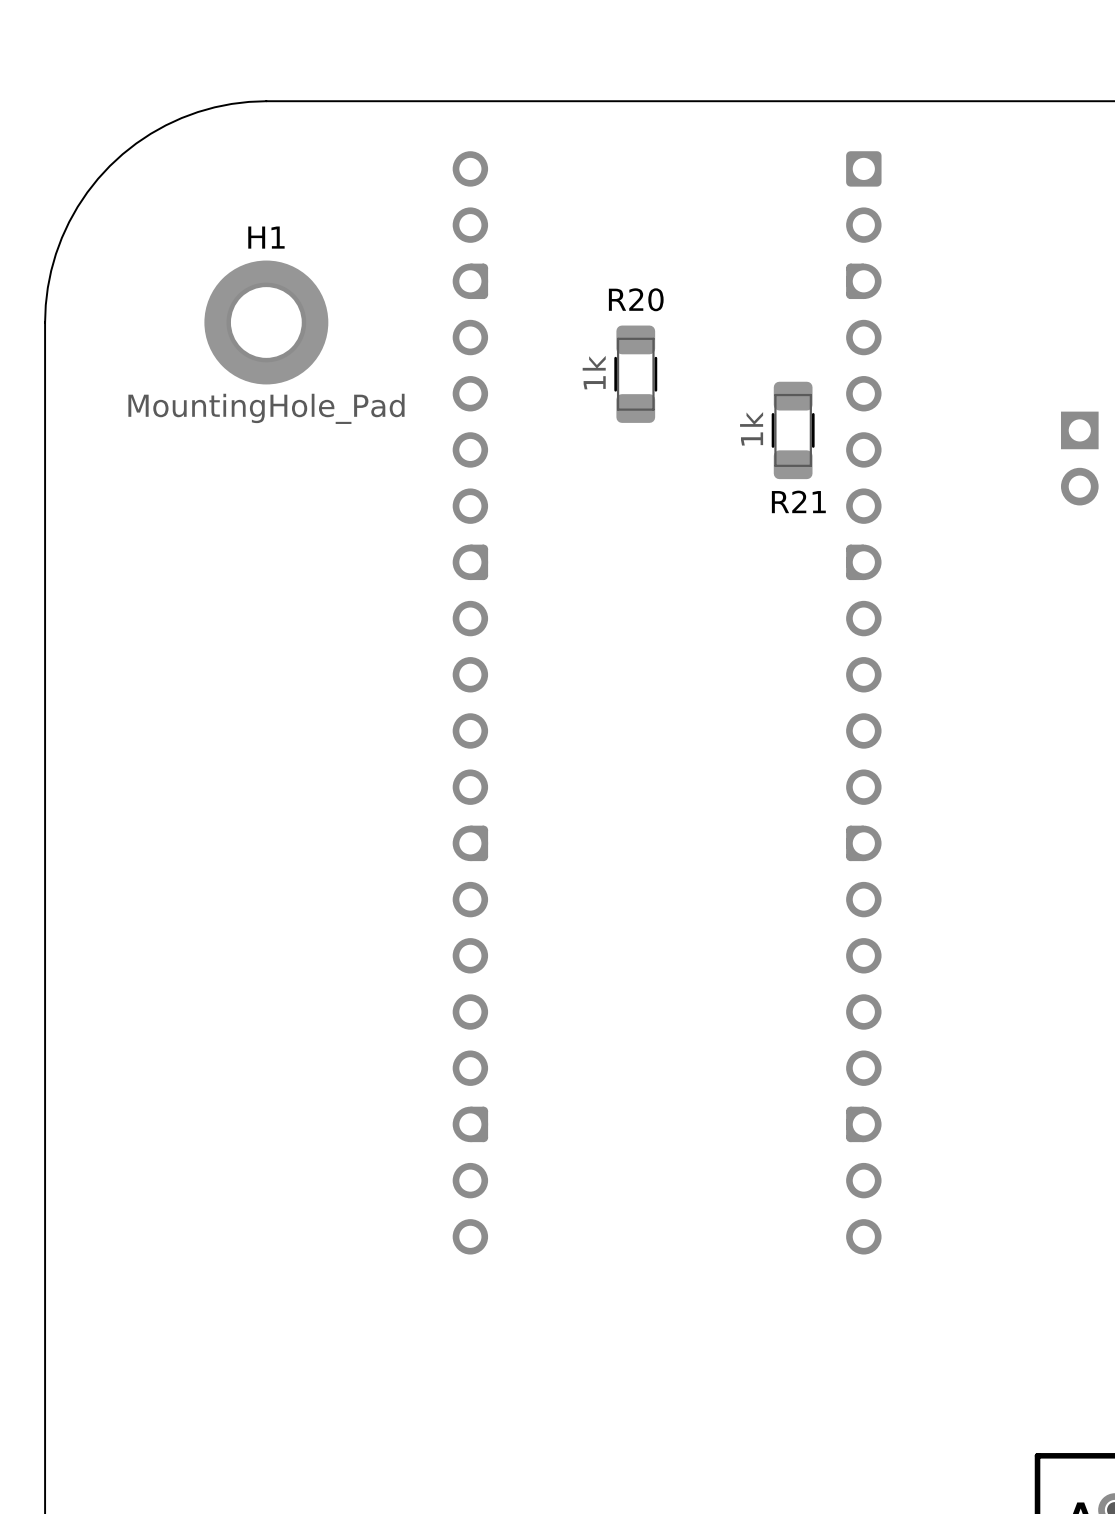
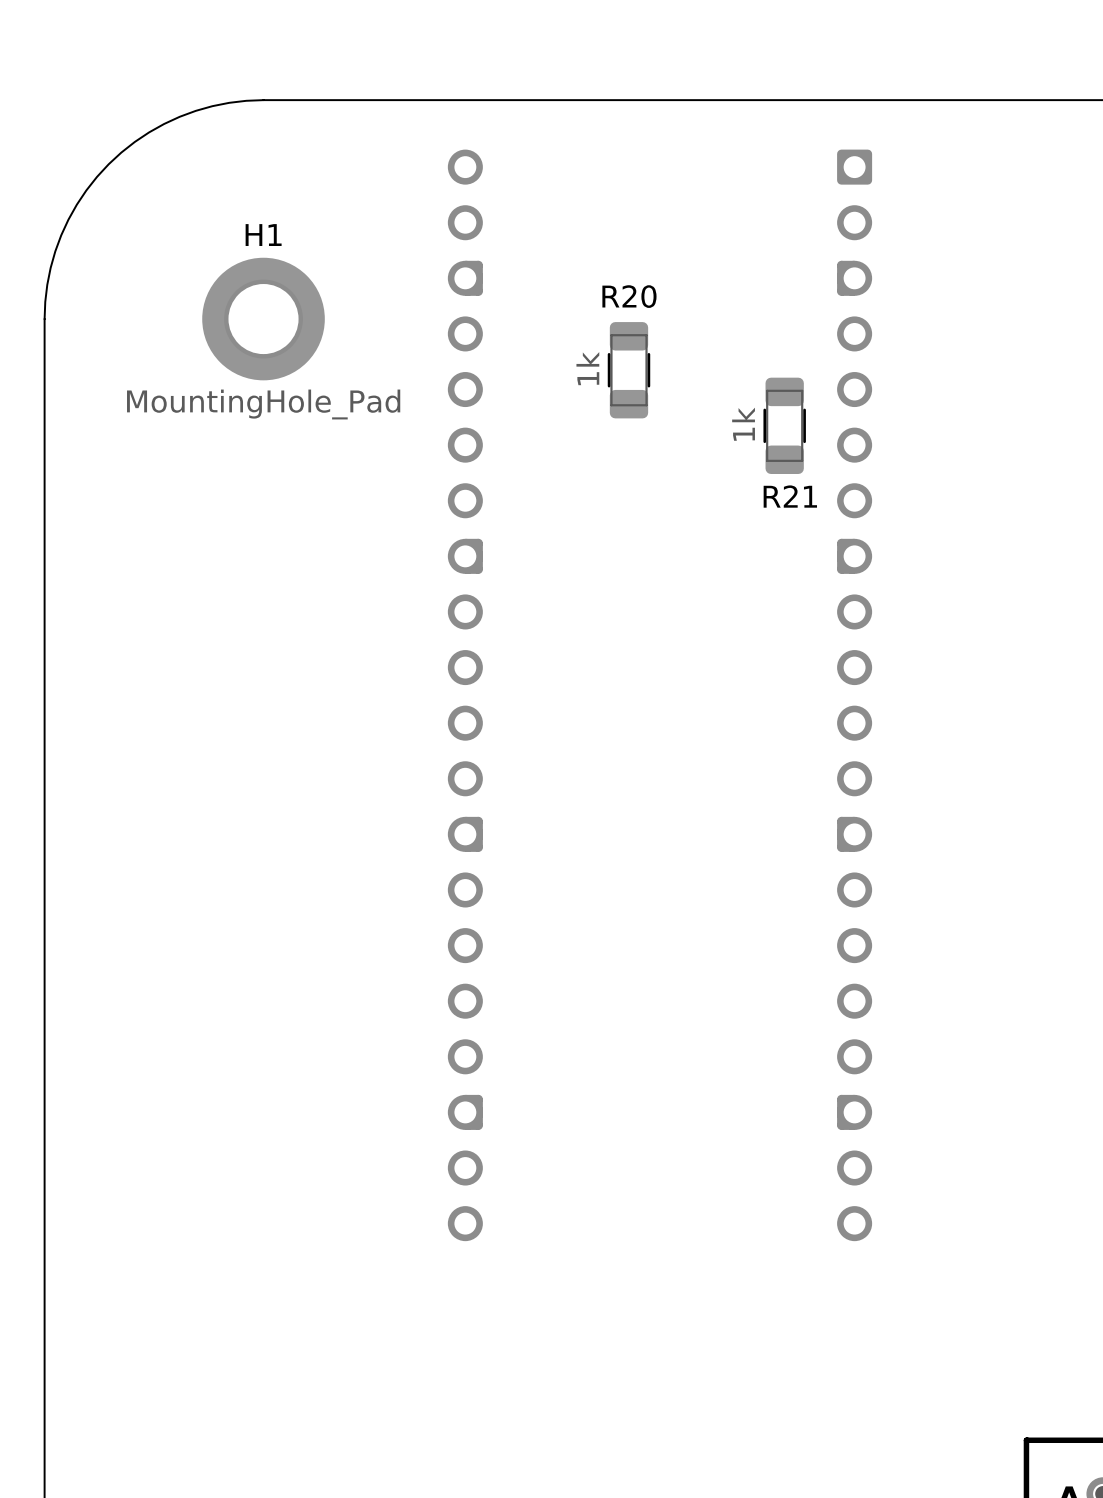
part: (1079, 458) -> none

